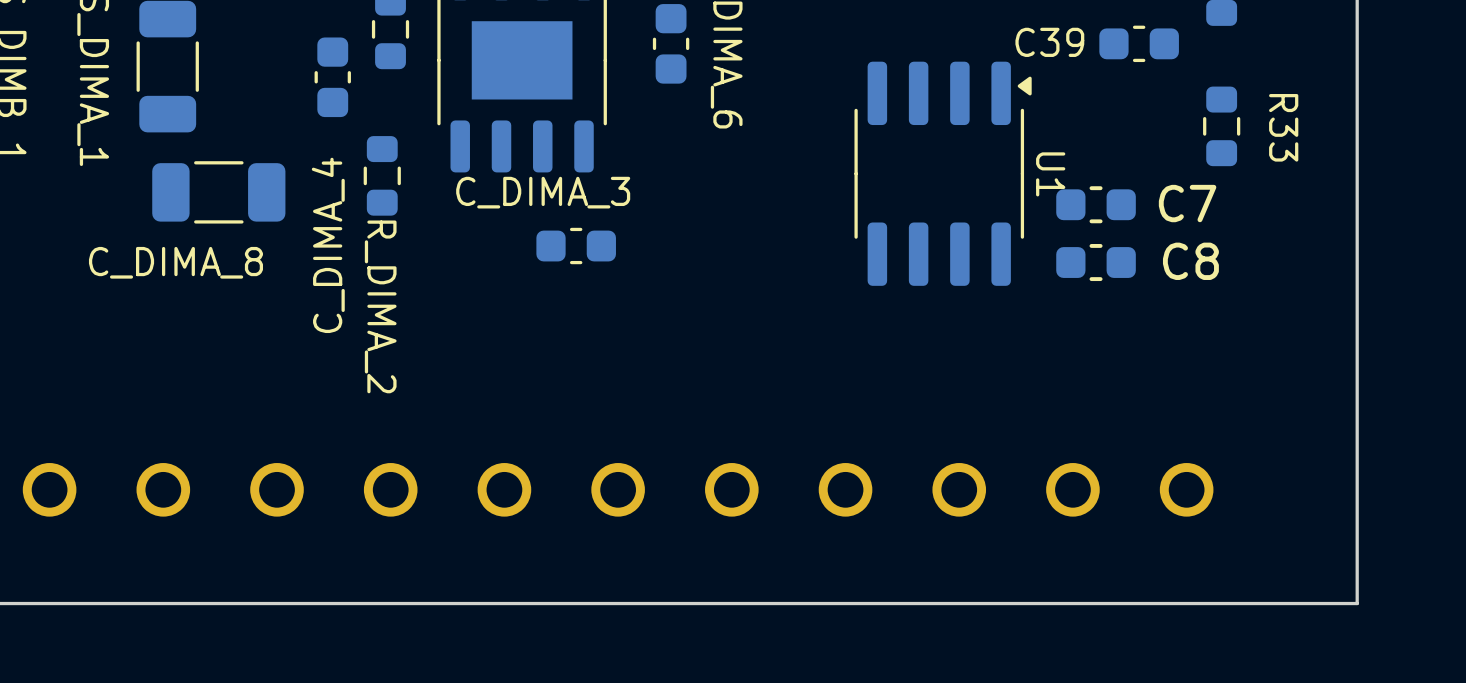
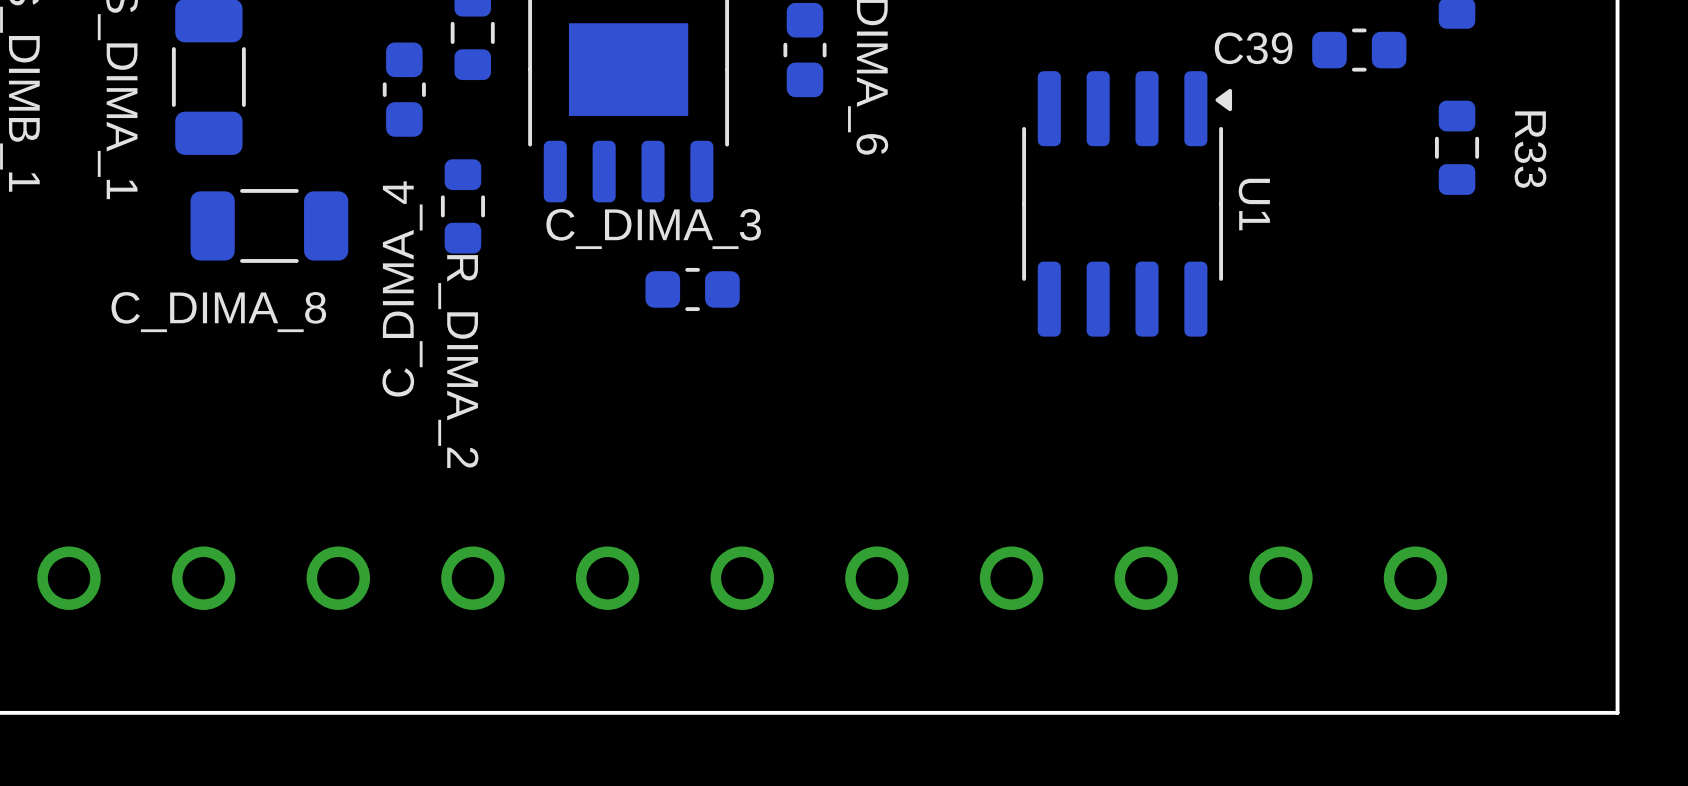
C7: (1096, 204) -> none
C8: (1096, 262) -> none

